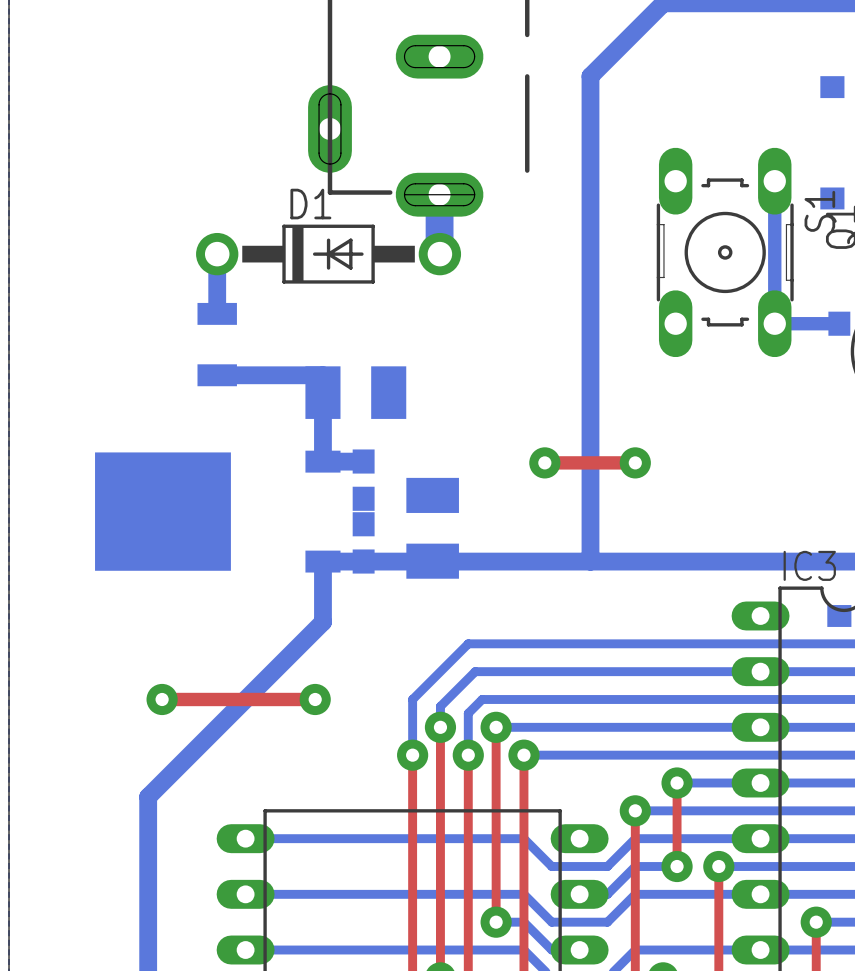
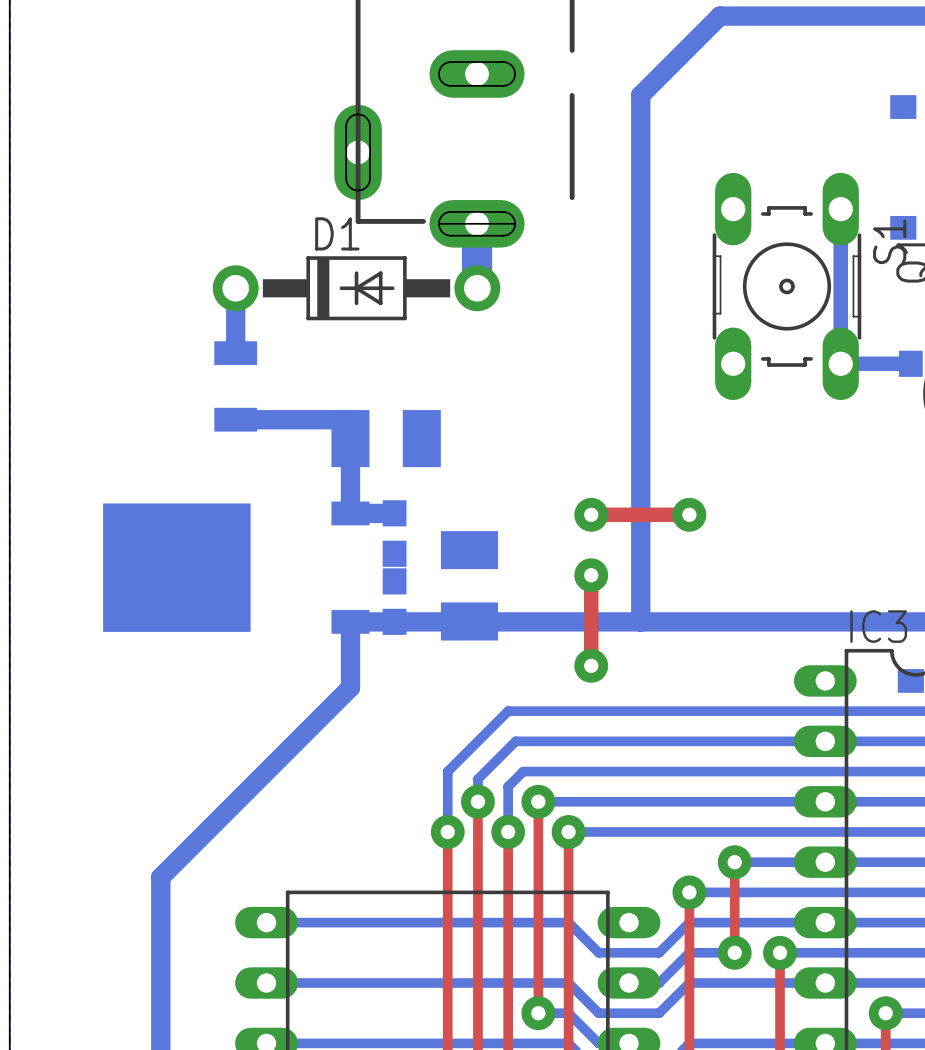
top track: none -> (591, 575) (591, 665)
via: none -> (591, 575)
via: none -> (591, 665)
top track: (162, 699) (315, 699) -> none
via: (162, 699) -> none
via: (315, 699) -> none

